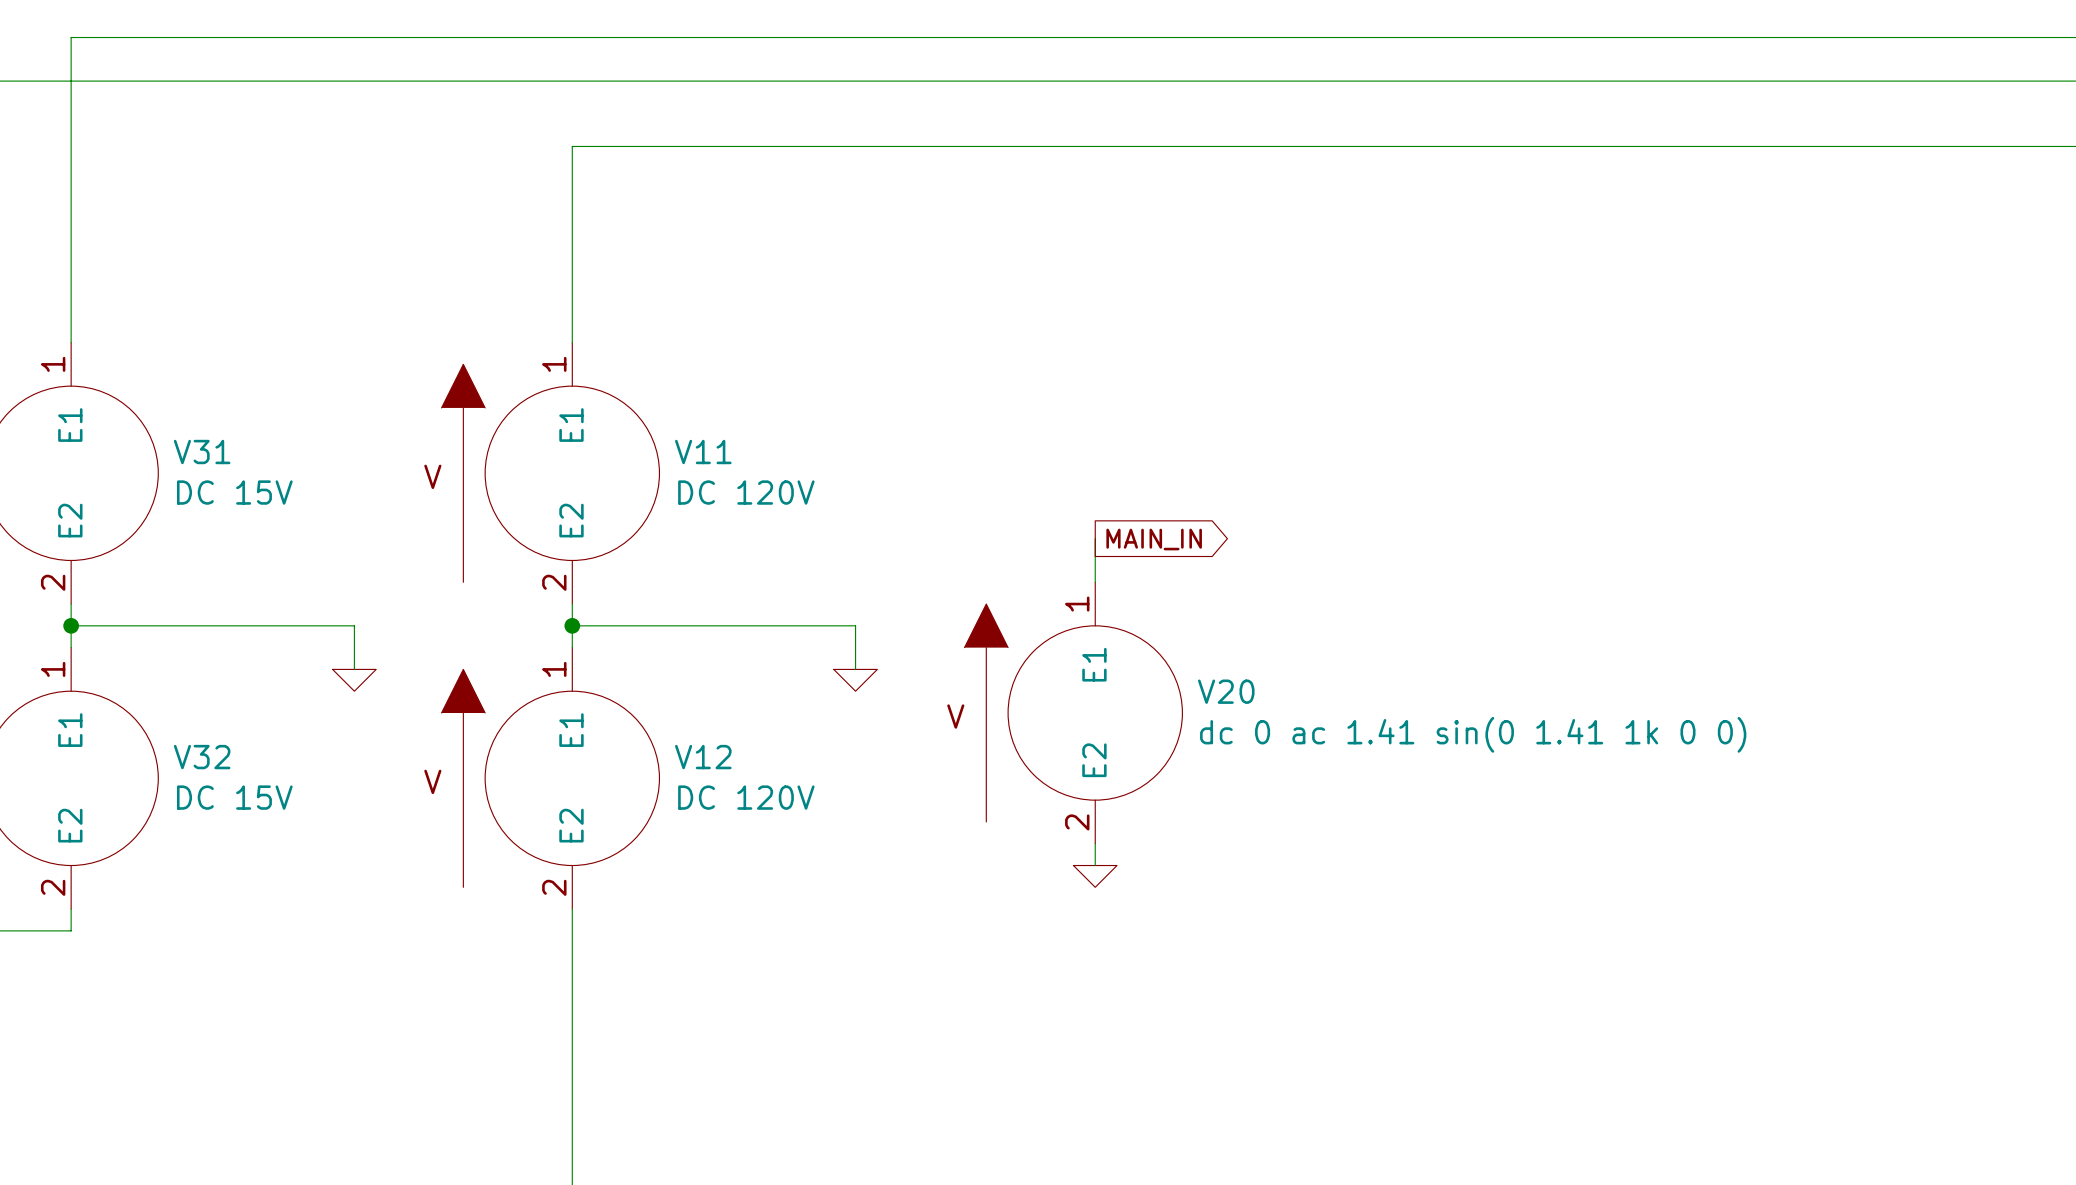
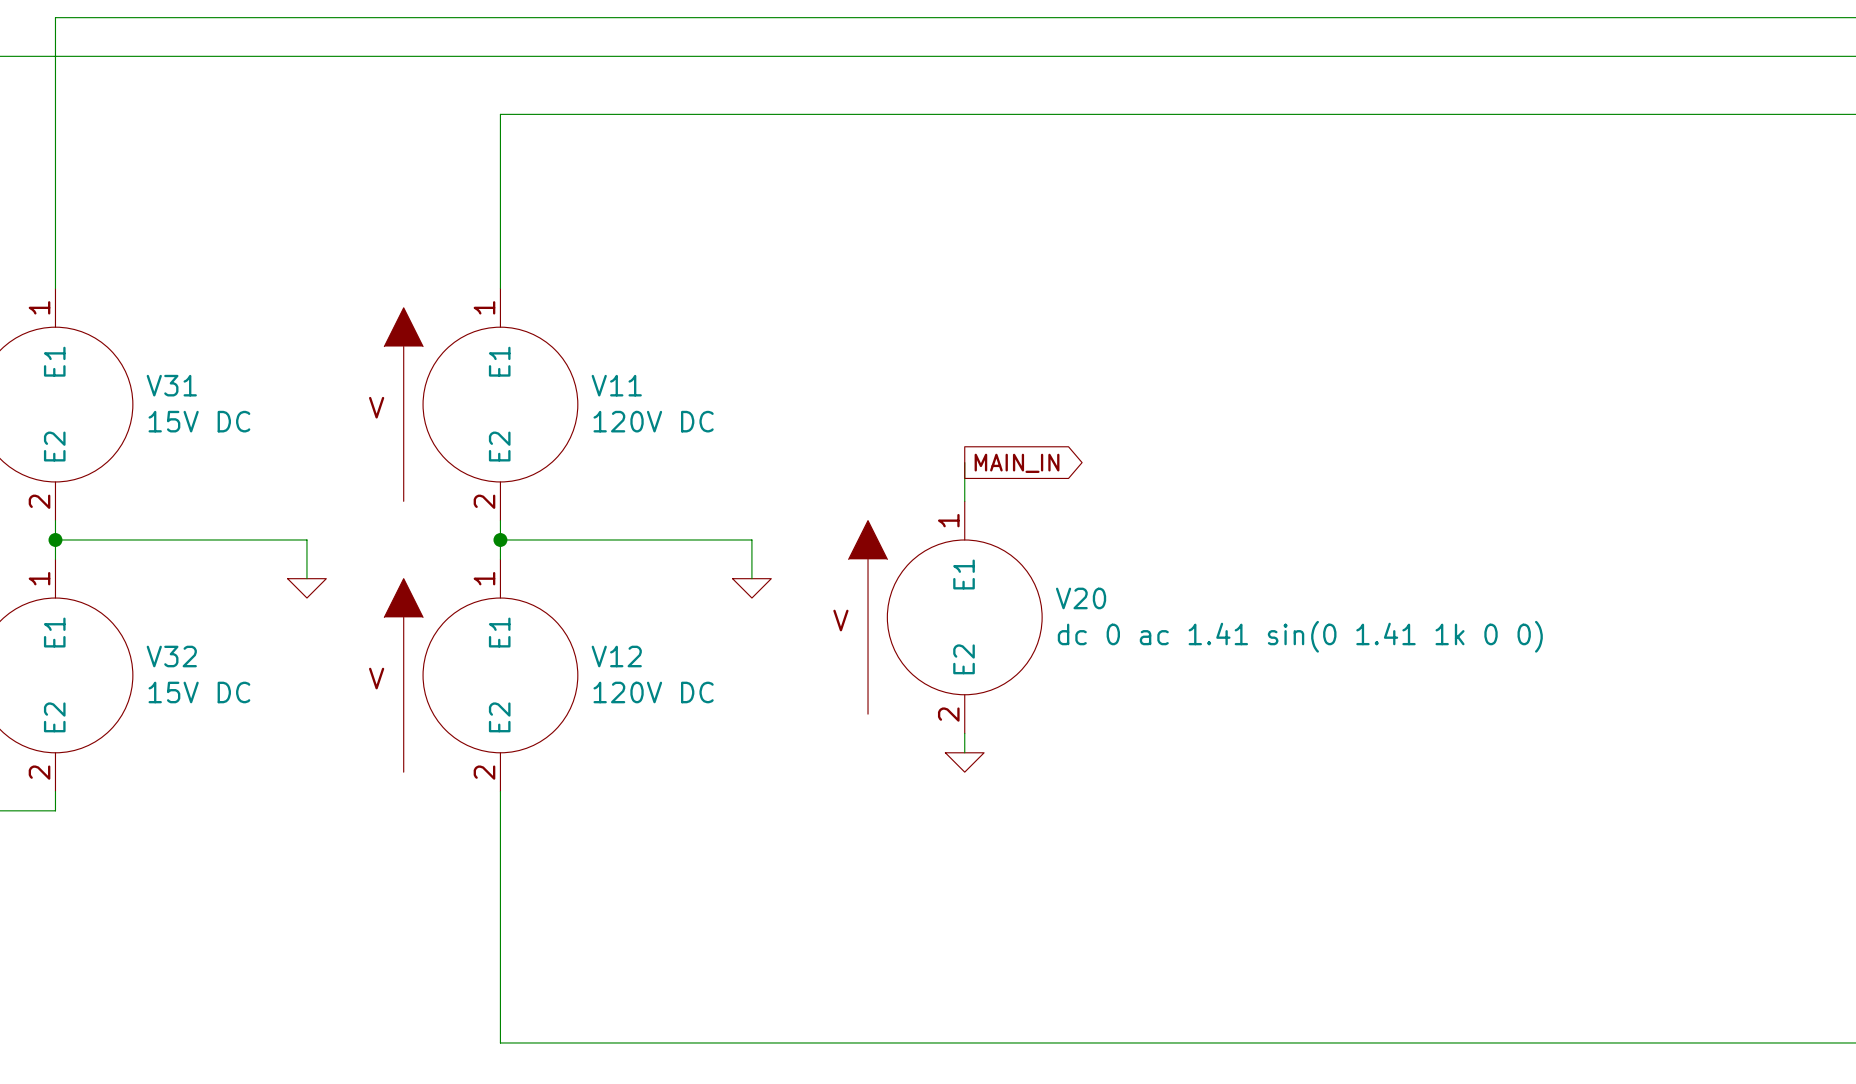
V31 value: DC 15V (234, 492) -> 15V DC (199, 421)
V11 value: DC 120V (746, 492) -> 120V DC (653, 421)
V32 value: DC 15V (234, 797) -> 15V DC (199, 692)
V12 value: DC 120V (746, 797) -> 120V DC (653, 692)

